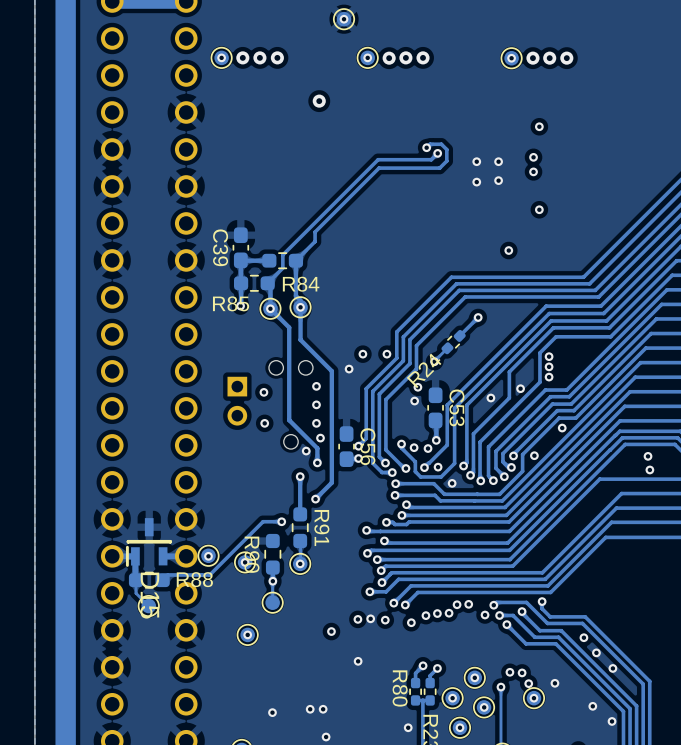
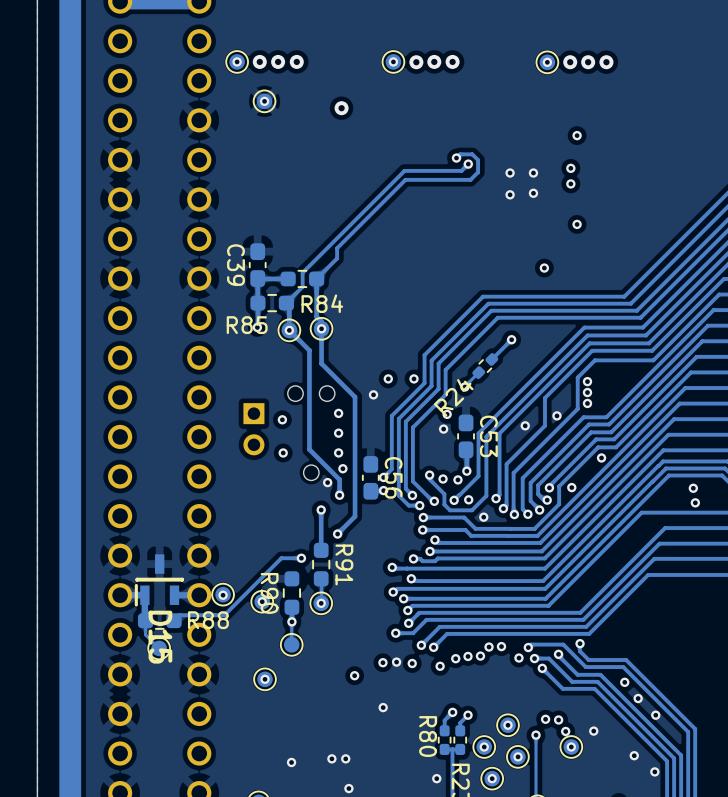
part position: (344, 19) -> (264, 101)
via: (344, 19) -> none
via: none -> (264, 101)

